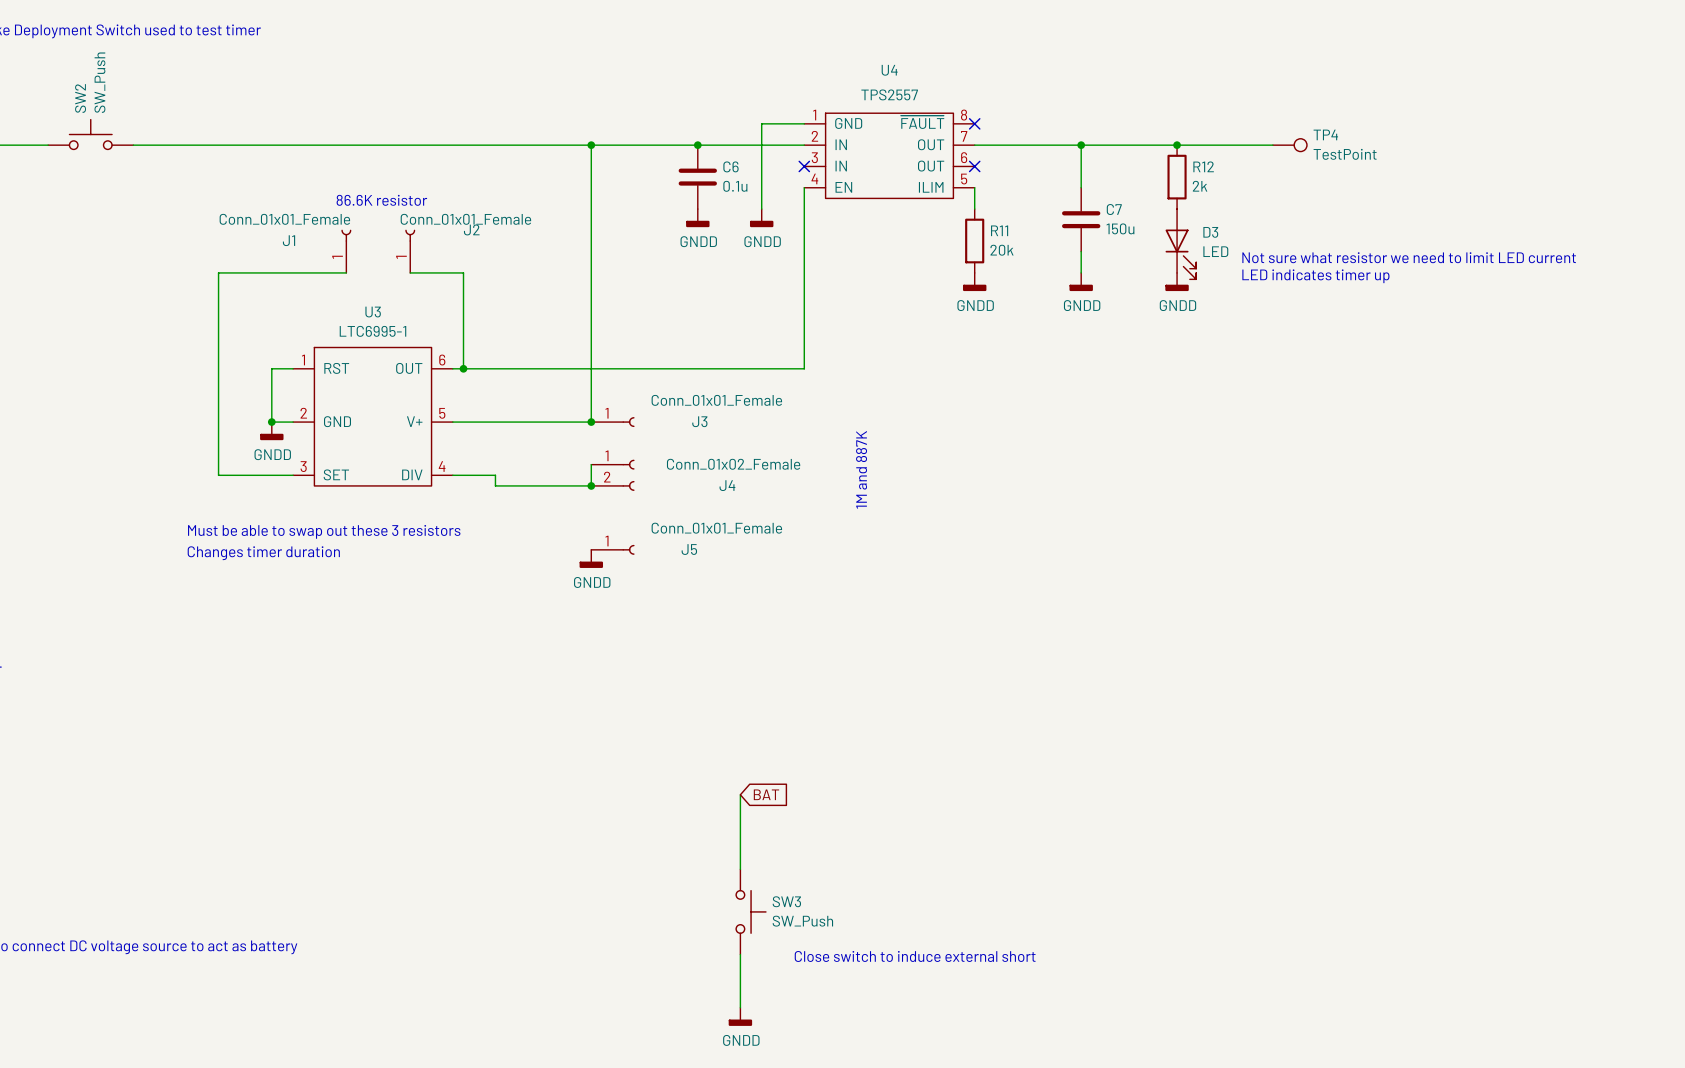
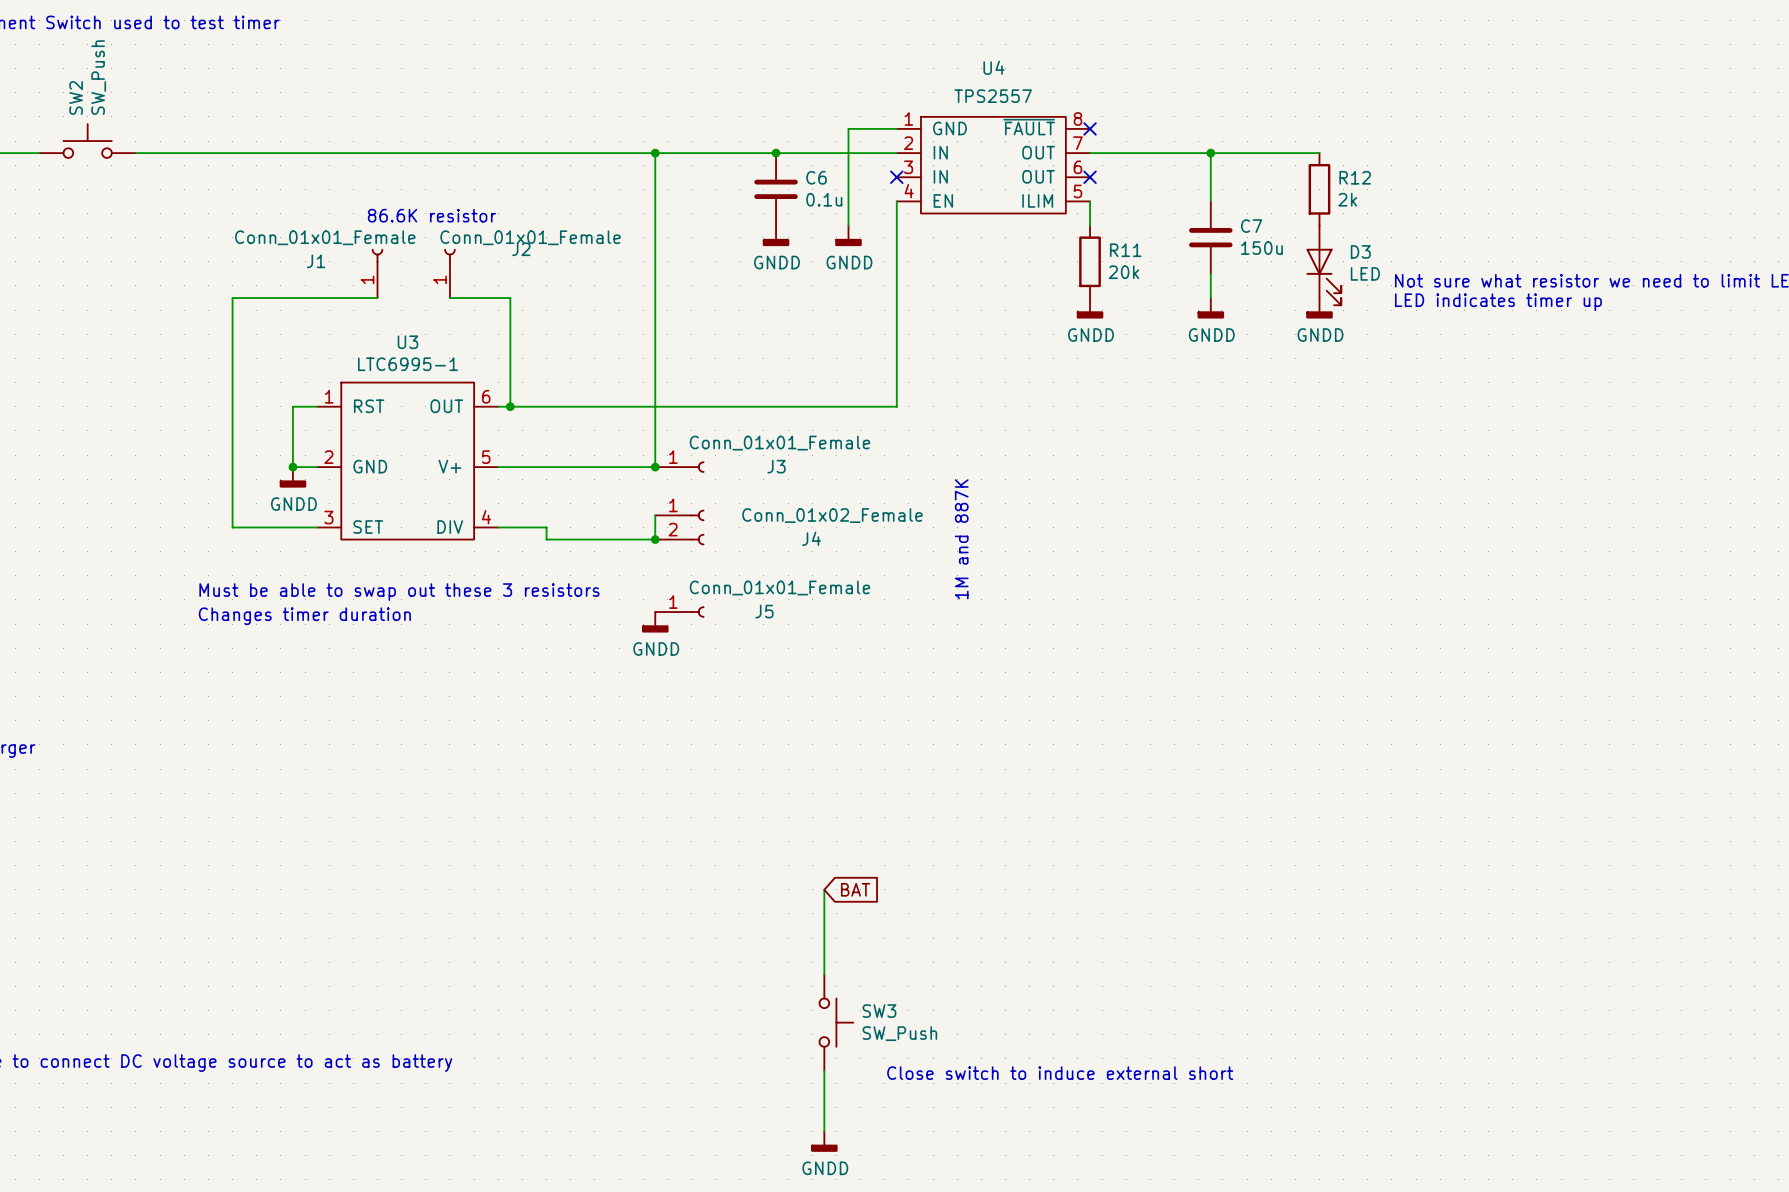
wire: (1177, 145) (1272, 145) -> none
junction: (1177, 145) -> none
TP4: TestPoint (1289, 145) -> none

